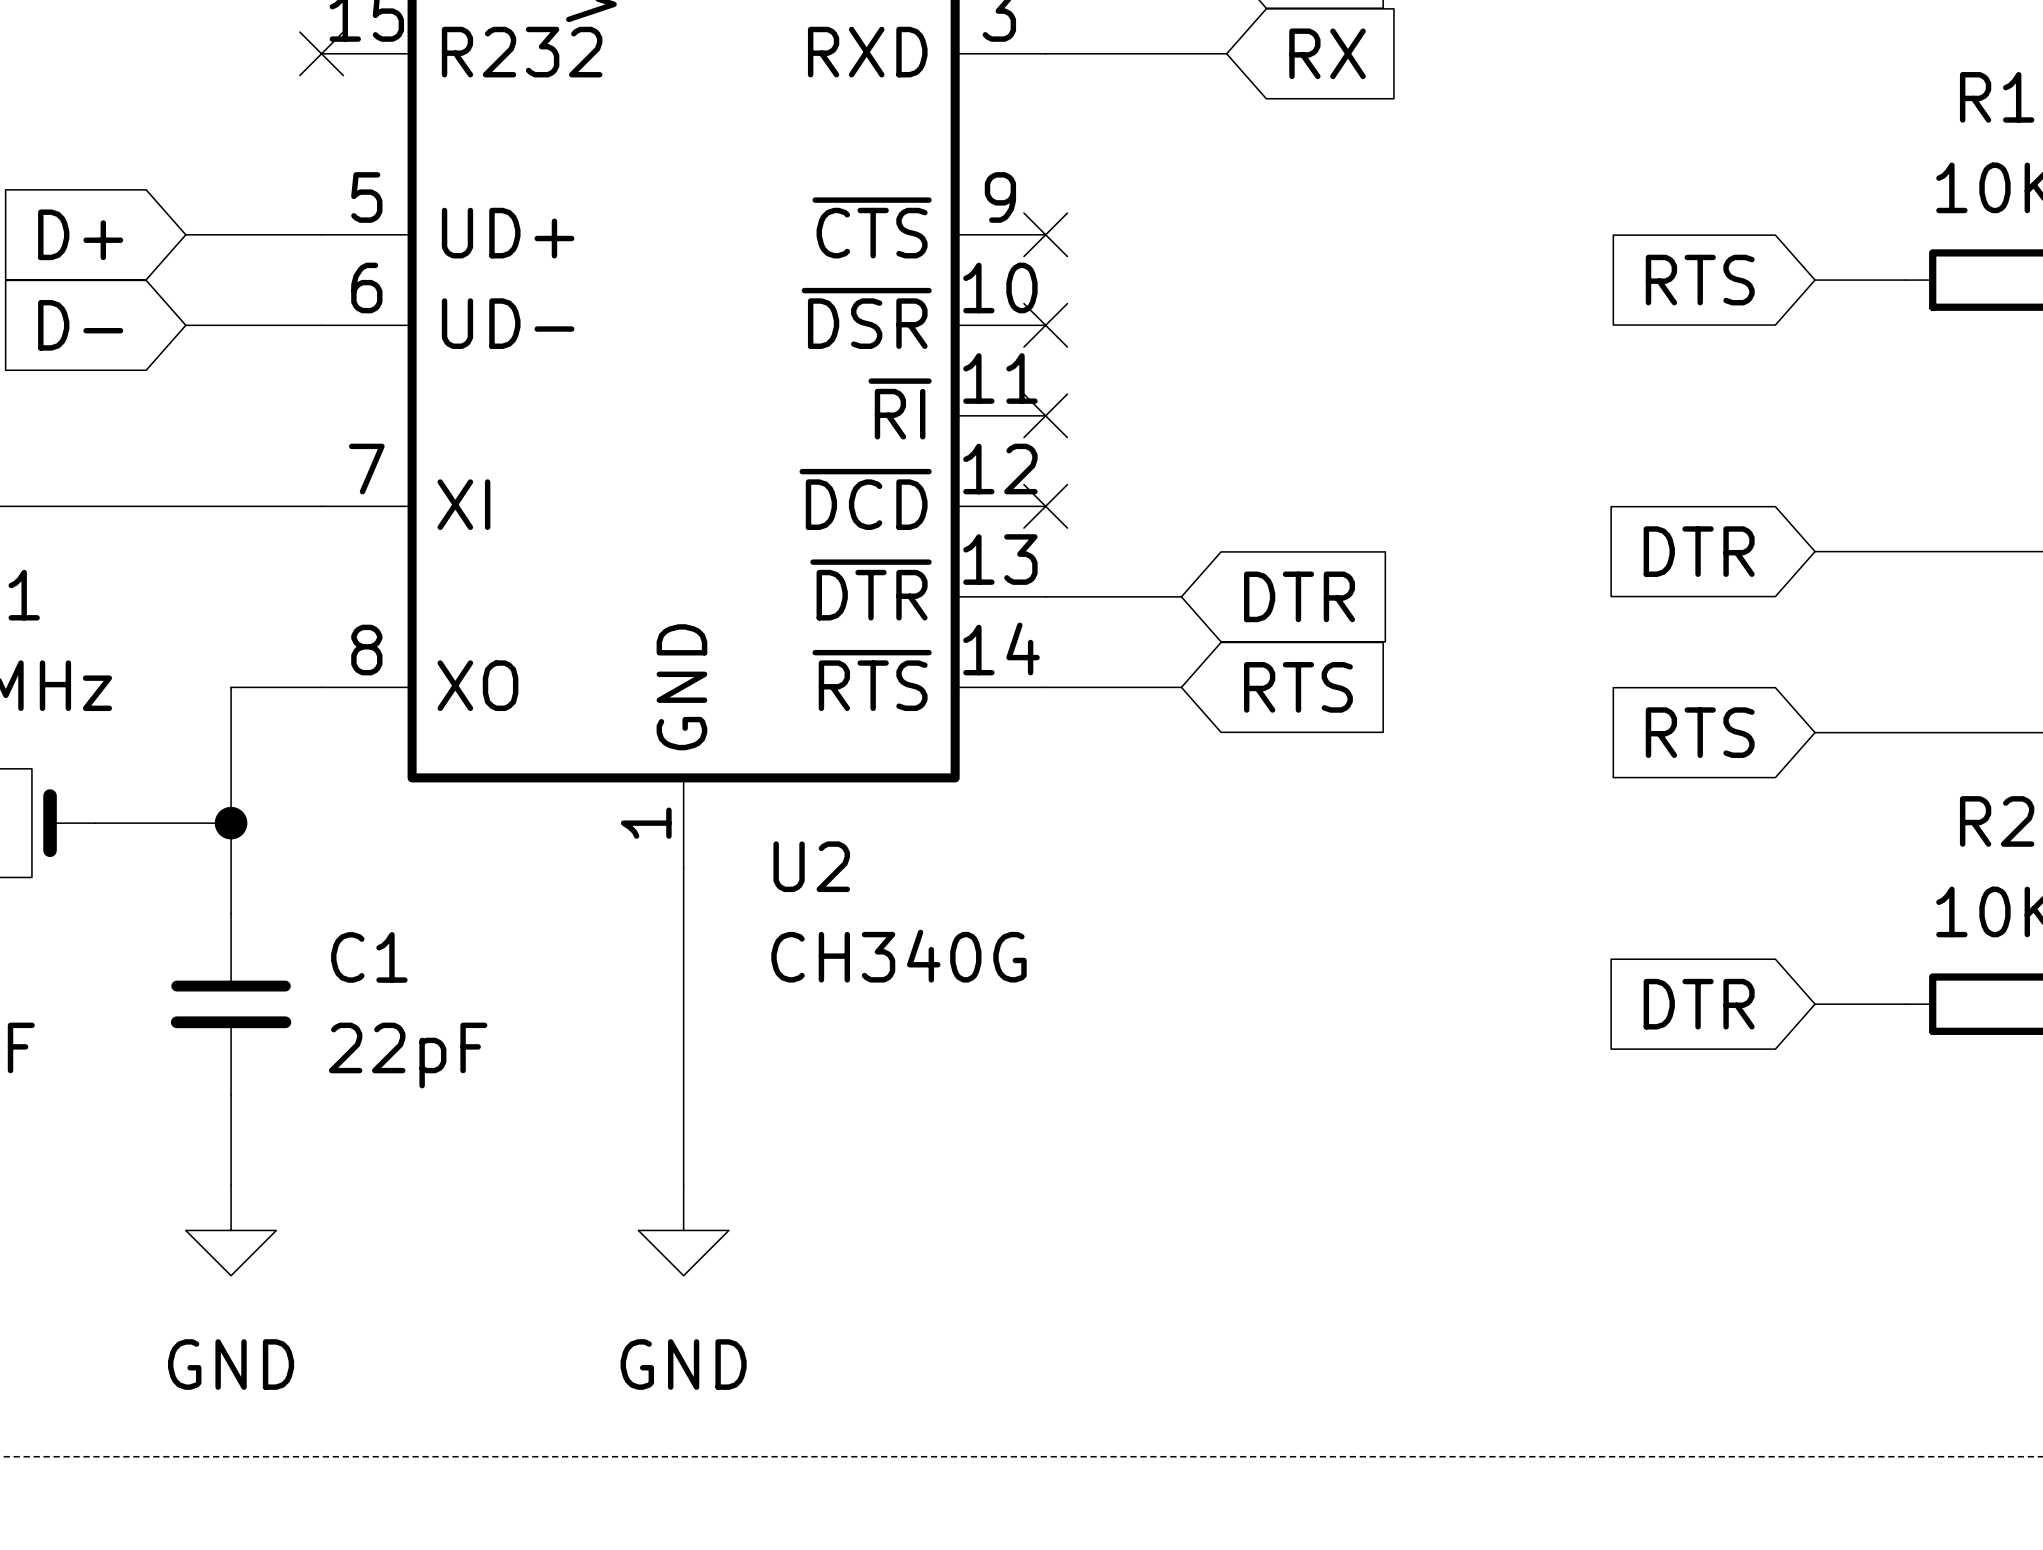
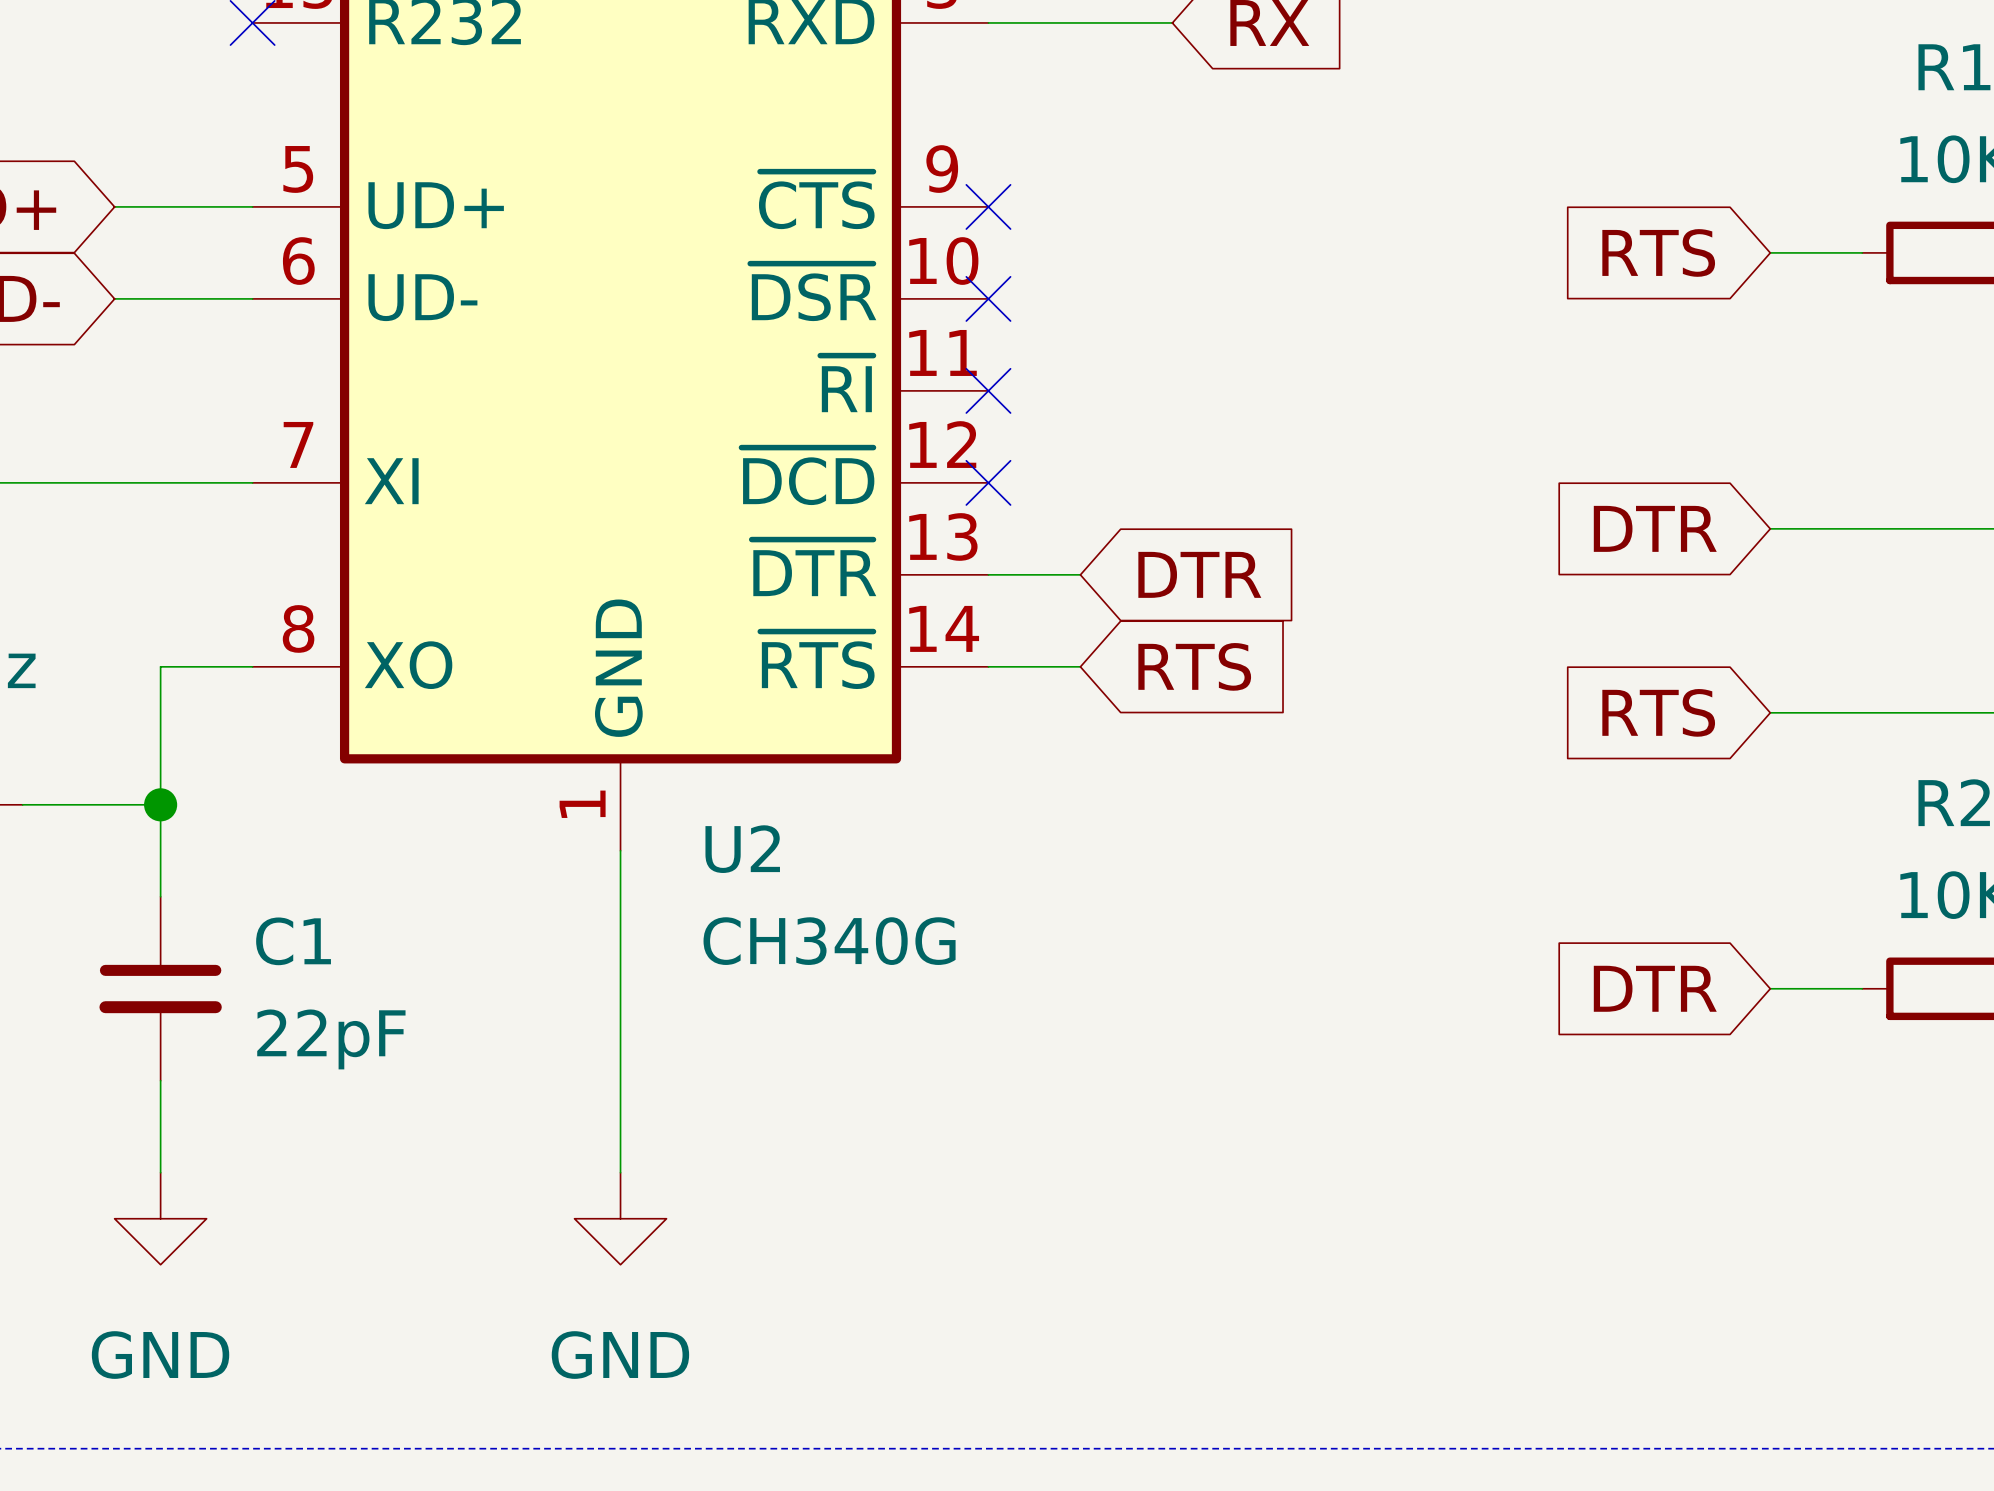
wire: (1136, 596) (1181, 596) -> none
global label position: DTR (1299, 596) -> DTR (1199, 574)
wire: (1136, 687) (1181, 687) -> none
global label position: RTS (1298, 687) -> RTS (1194, 666)

